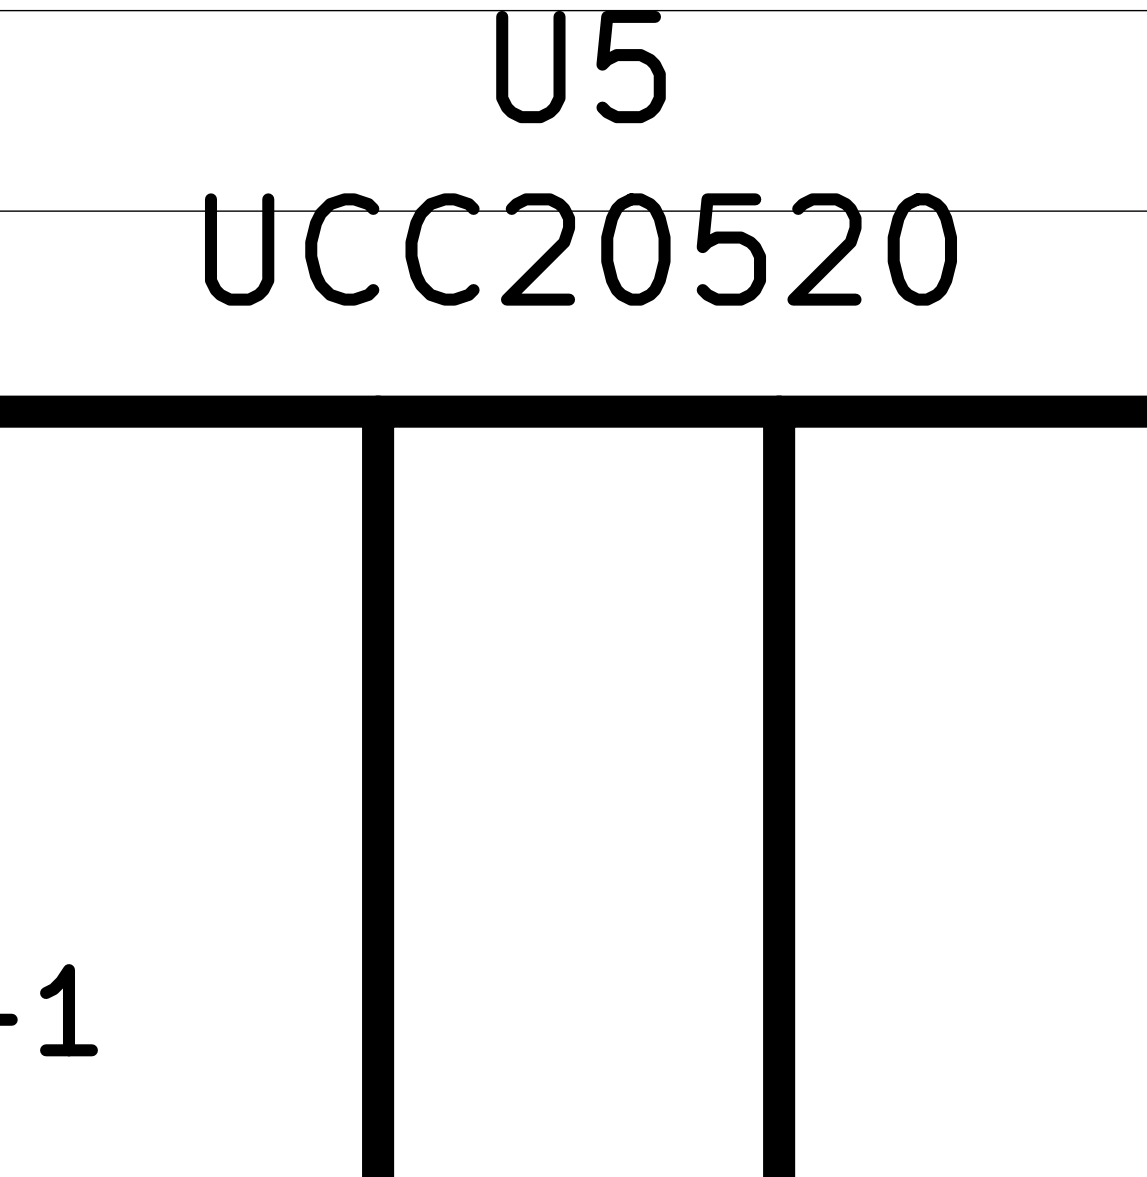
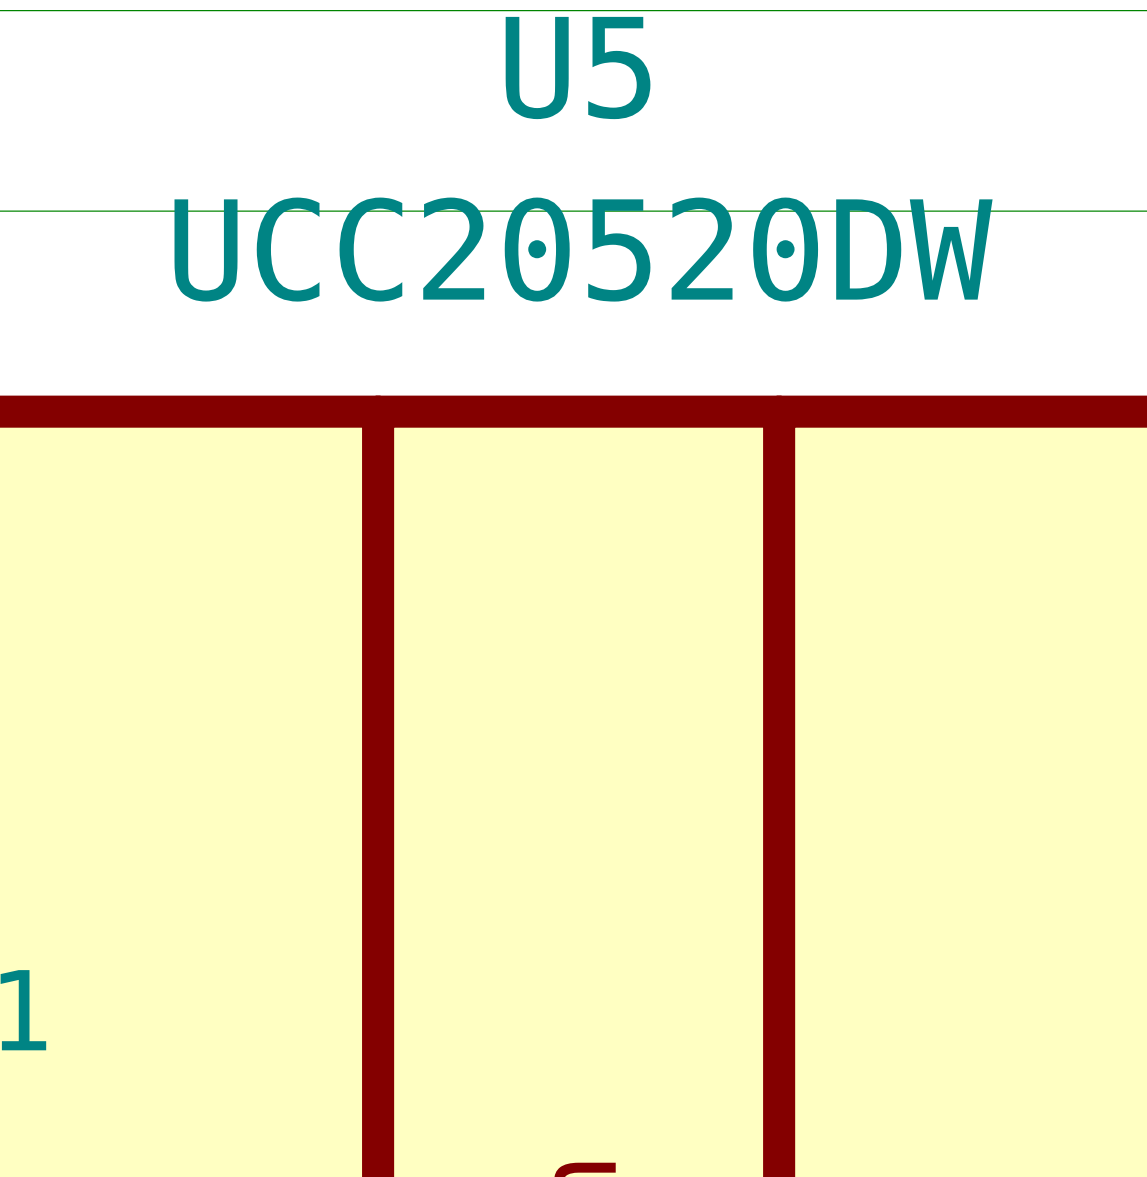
U5 value: UCC20520 (580, 249) -> UCC20520DW (583, 249)

